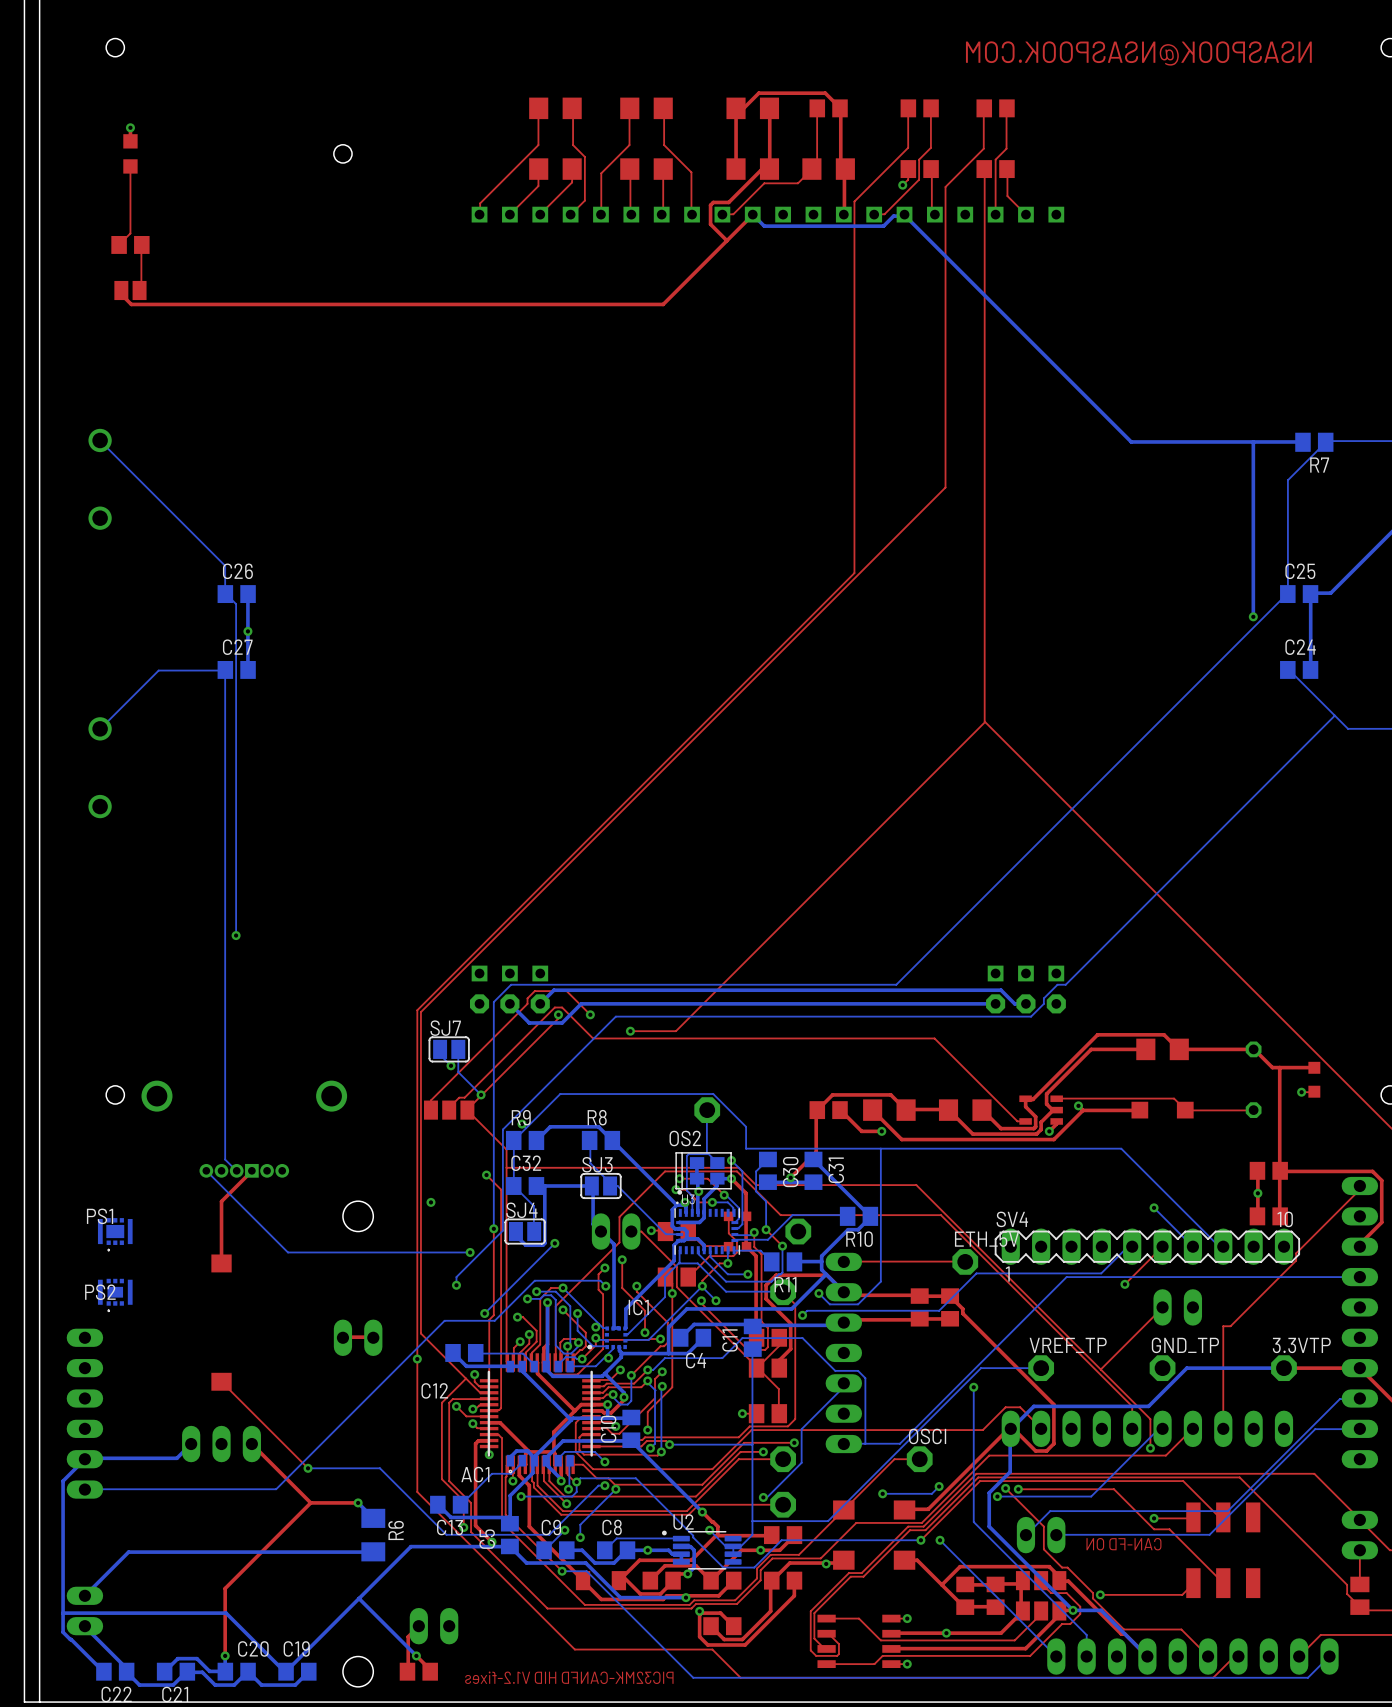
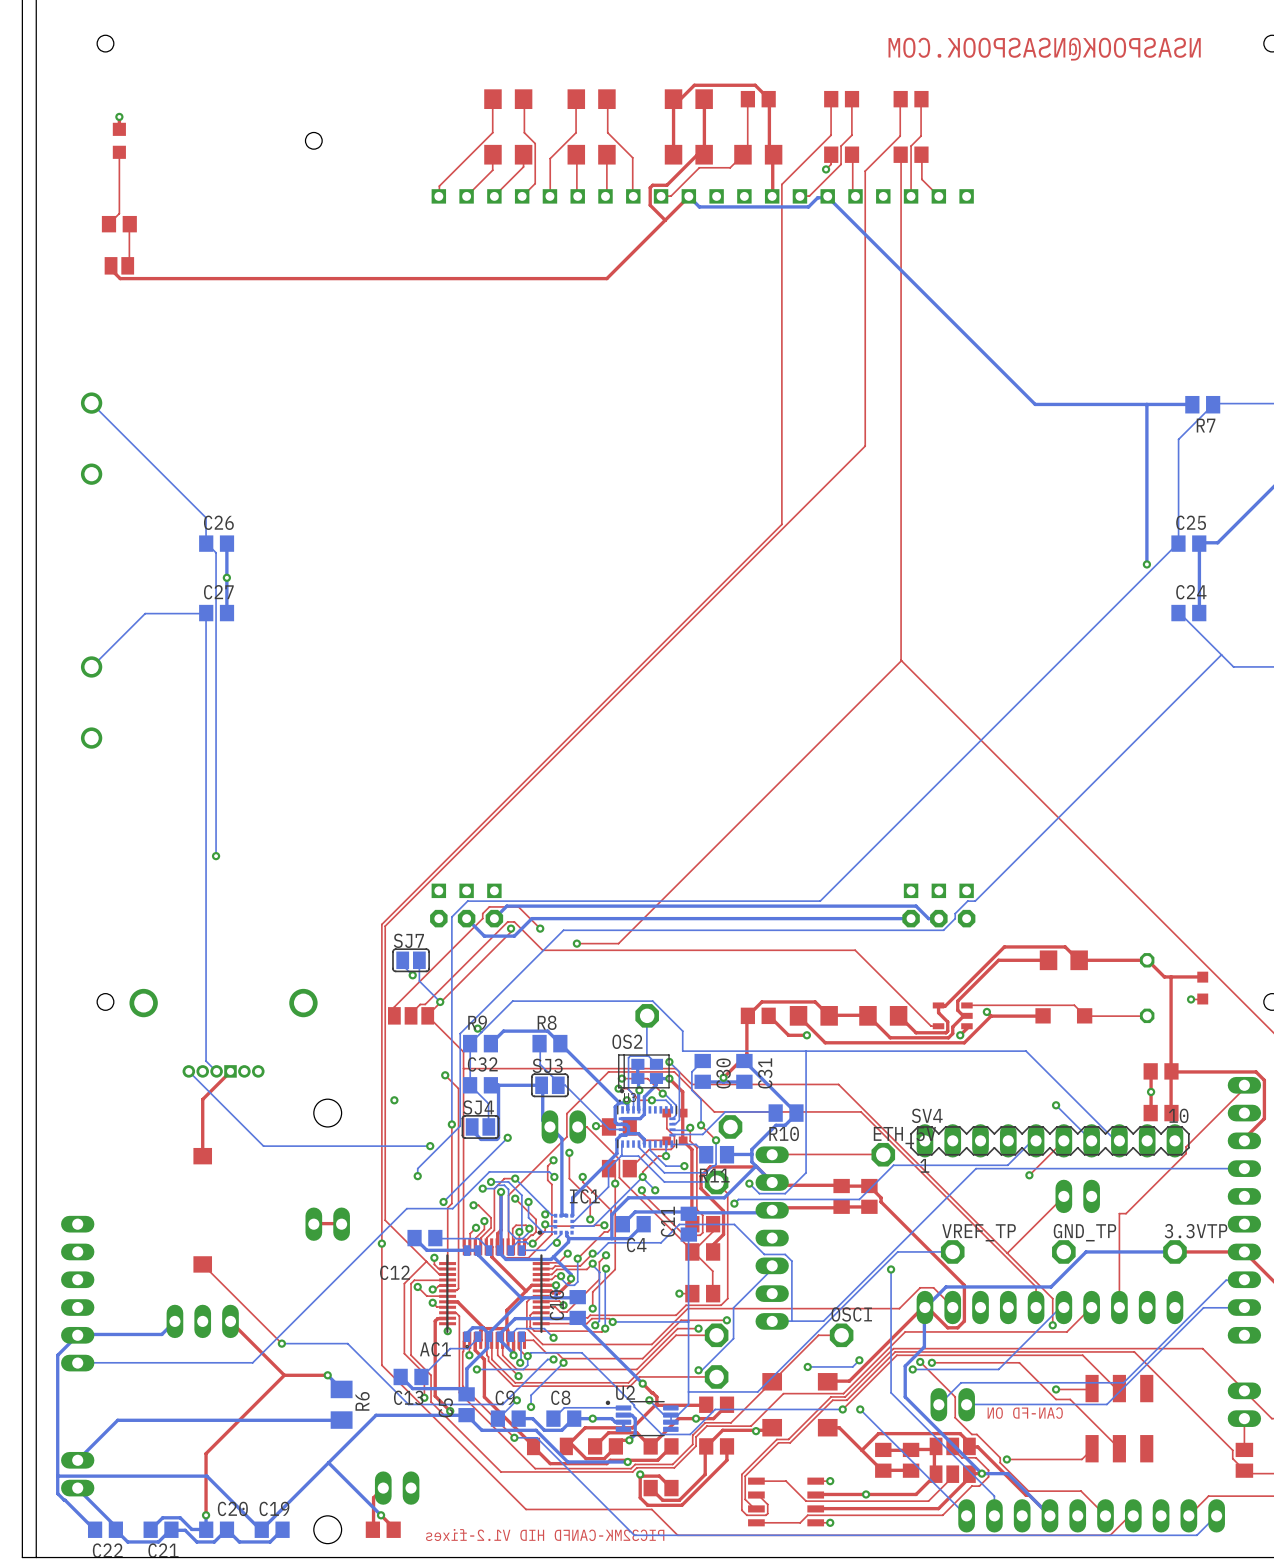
PS1: (115, 1234) -> none
PS2: (115, 1295) -> none

